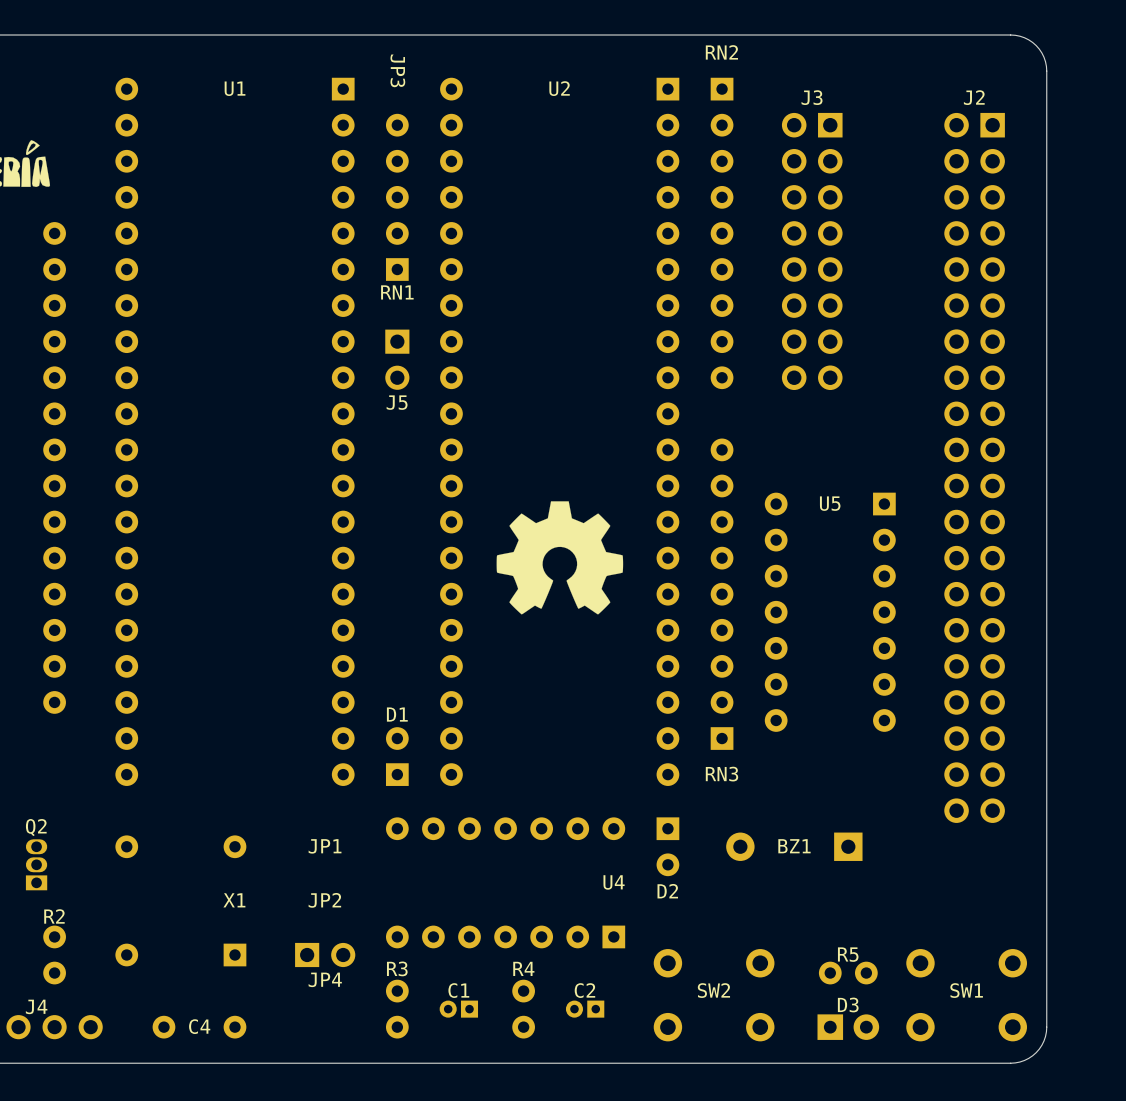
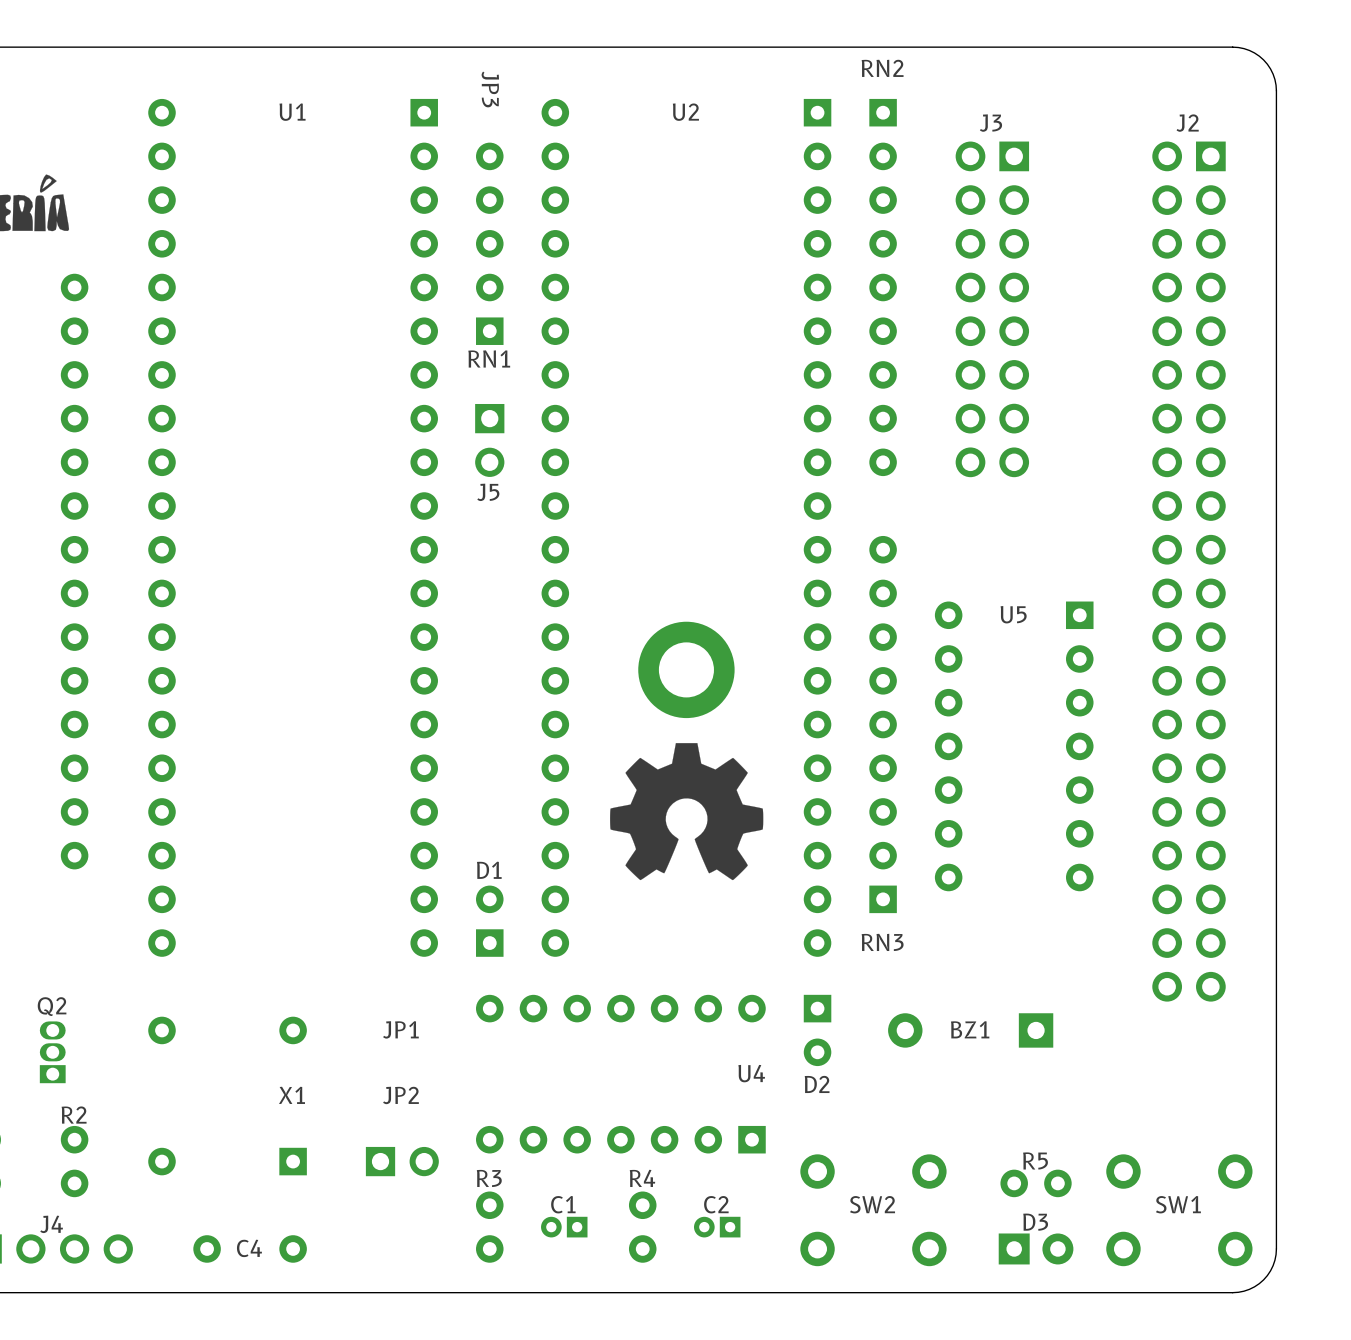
part: none -> (686, 669)
drawing position: (559, 557) -> (686, 811)
JP4 name: JP4 (325, 979) -> none

